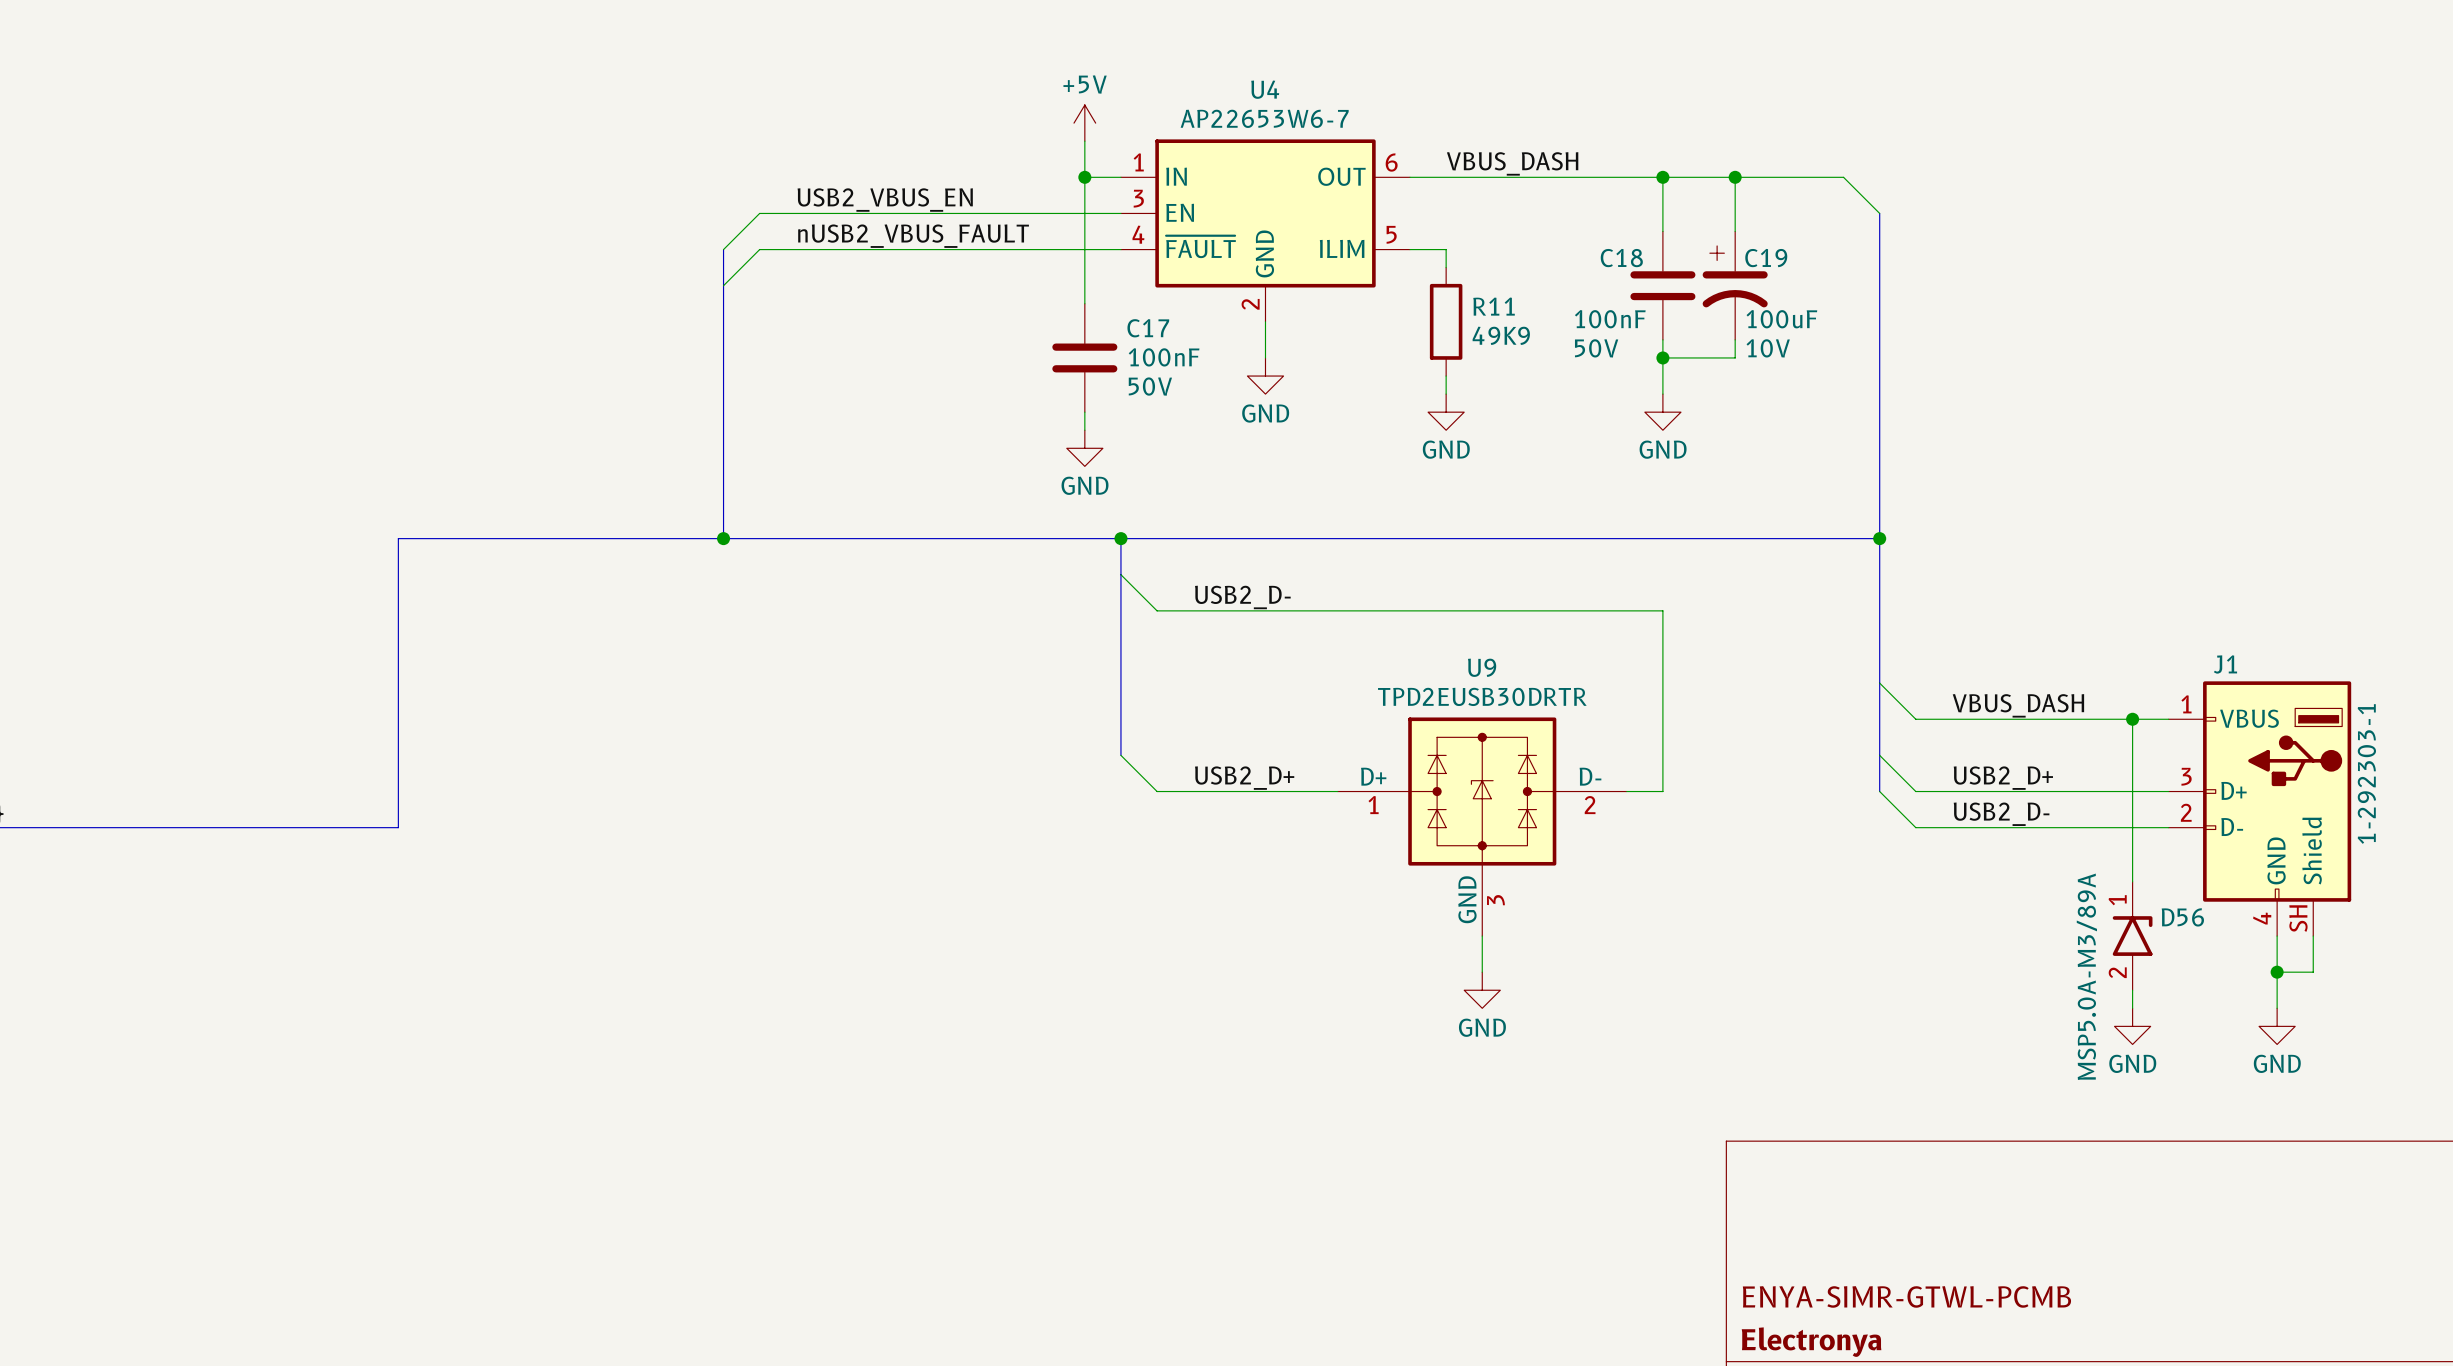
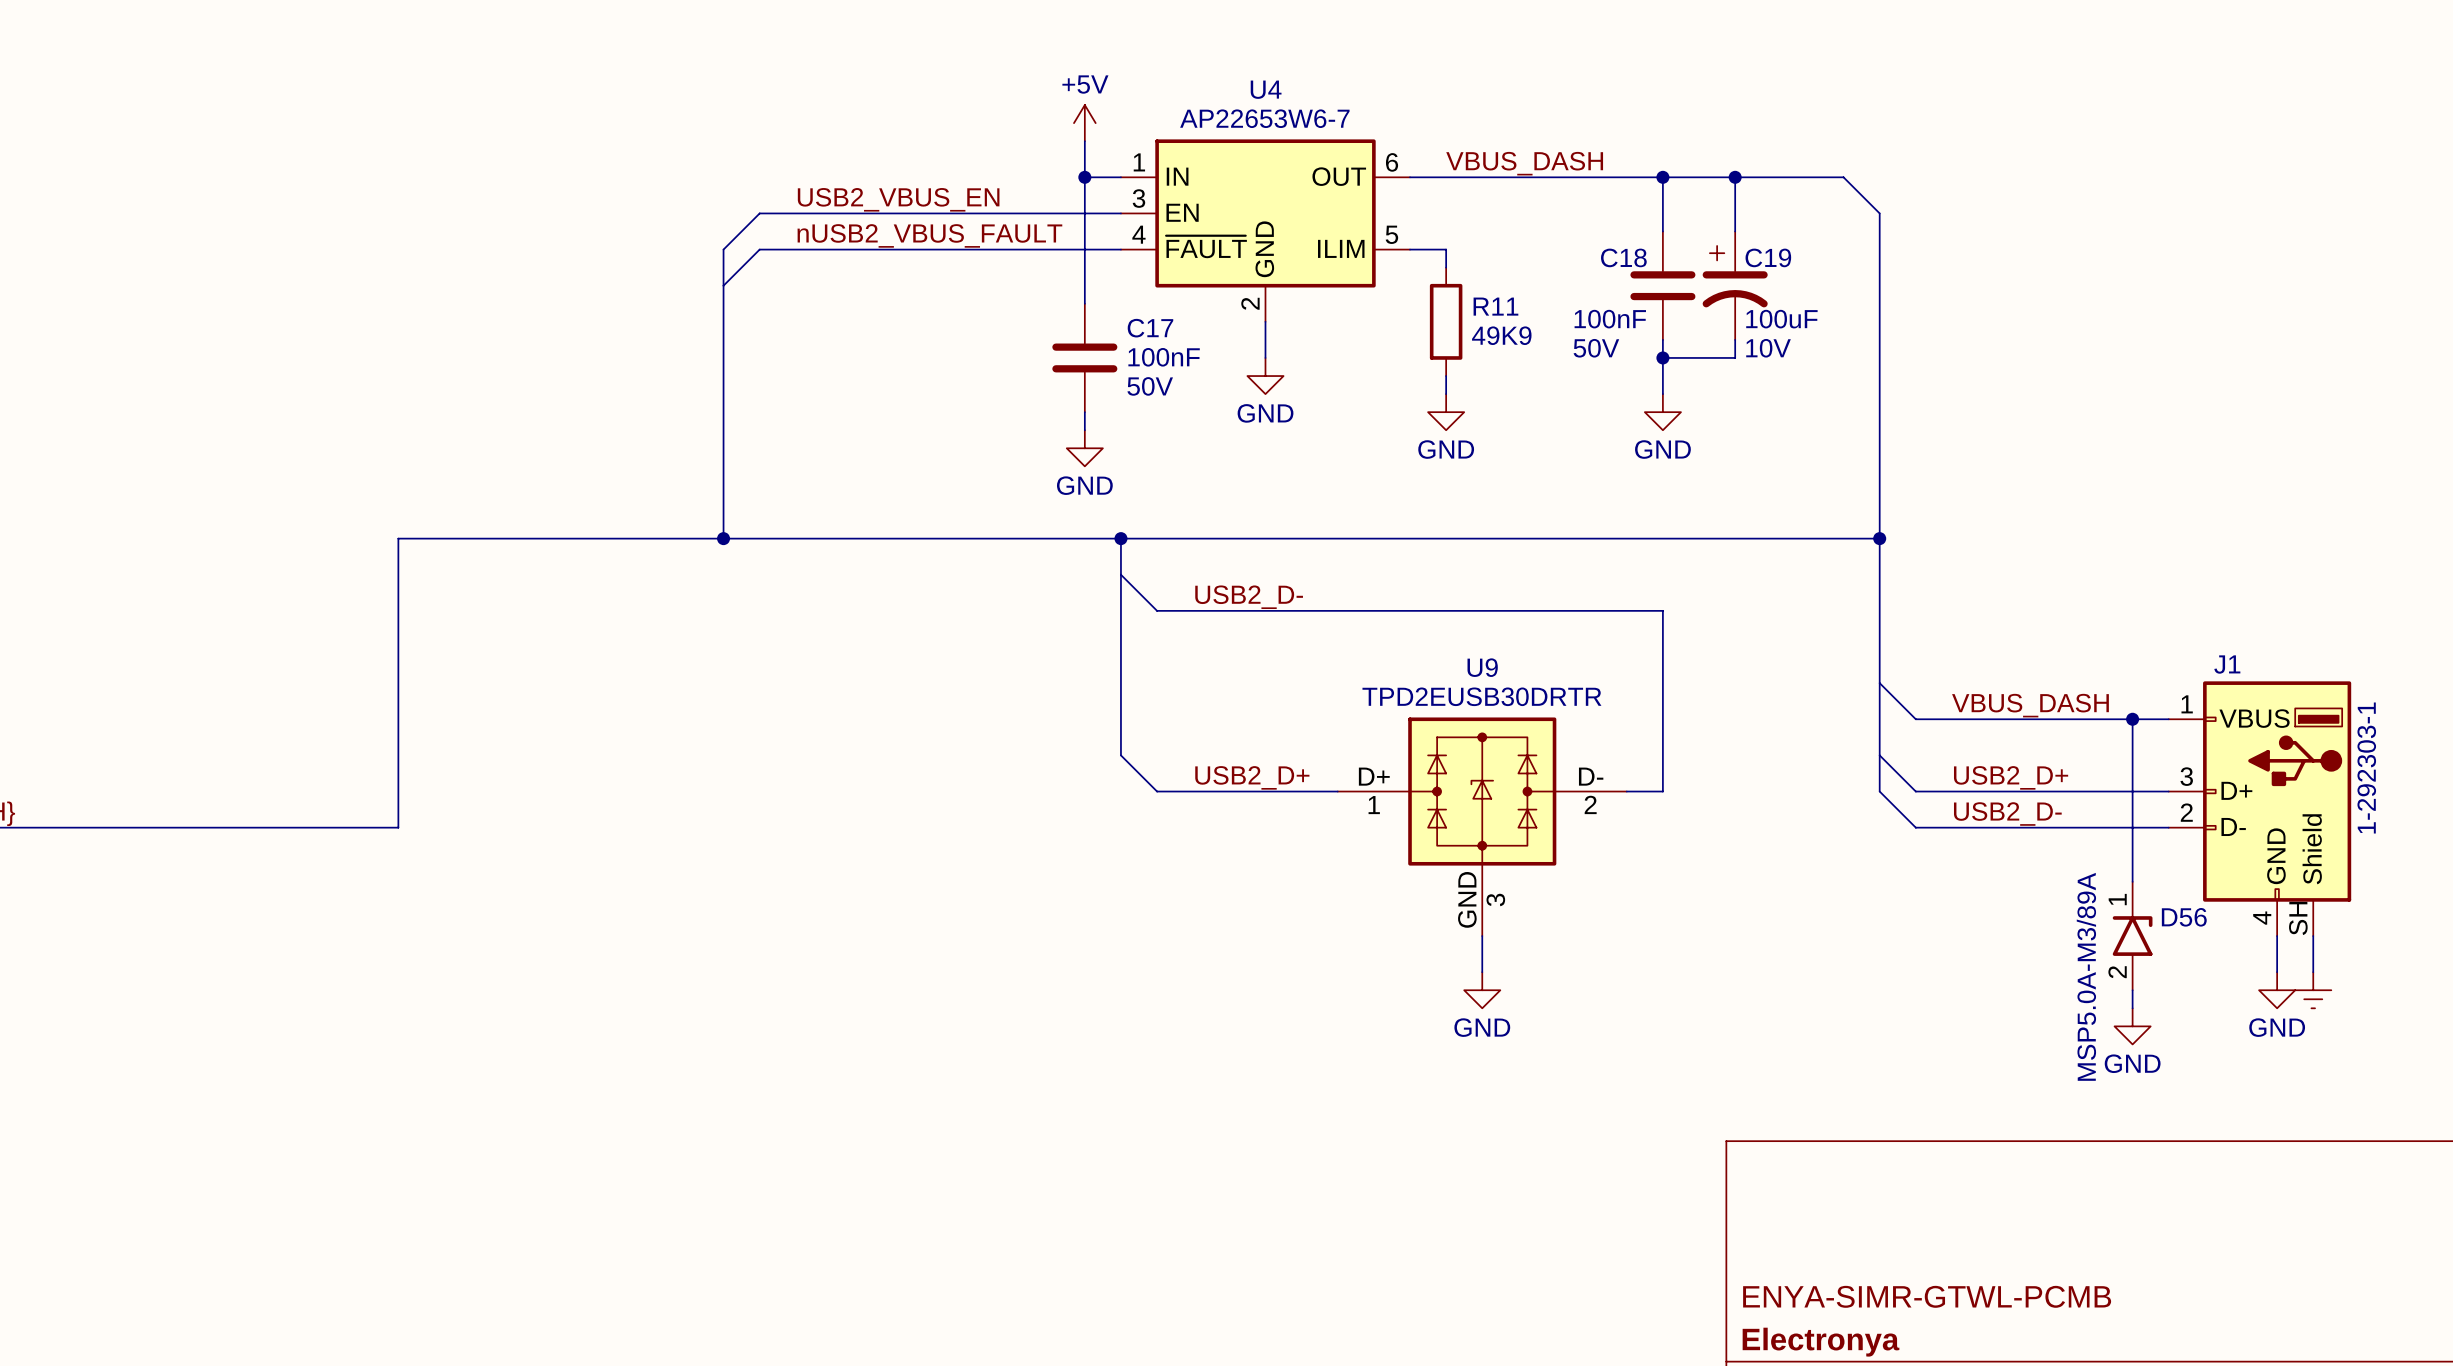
junction: (2277, 972) -> none
wire: (2313, 972) (2277, 972) (2277, 1008) -> none
power symbol: none -> (2313, 990)
power symbol position: GND (2277, 1026) -> GND (2277, 990)

